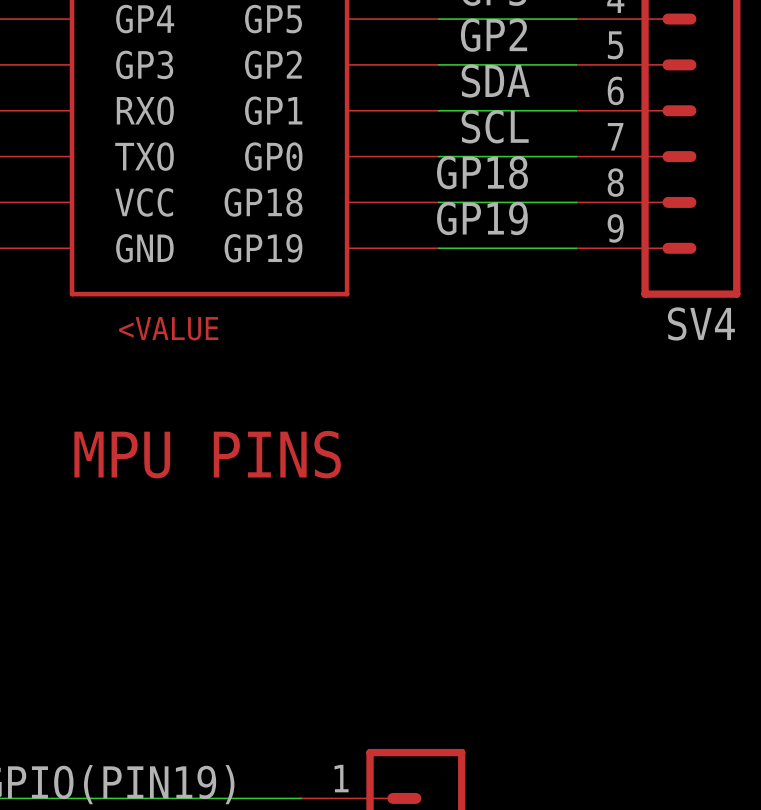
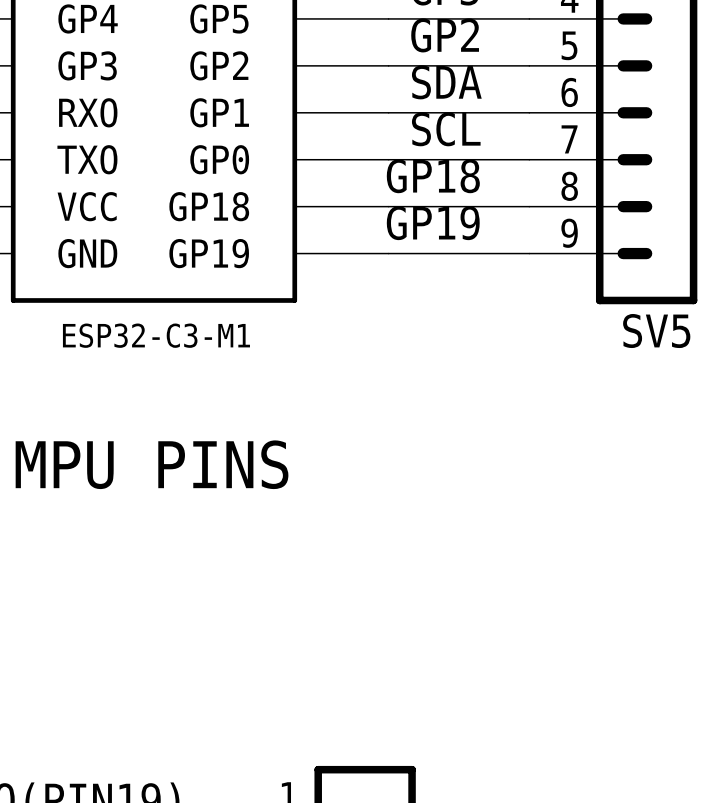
SV4 name: SV4 (701, 323) -> SV5 (656, 331)
part text: <VALUE (168, 328) -> none
part value: none -> ESP32-C3-M1 (156, 335)

